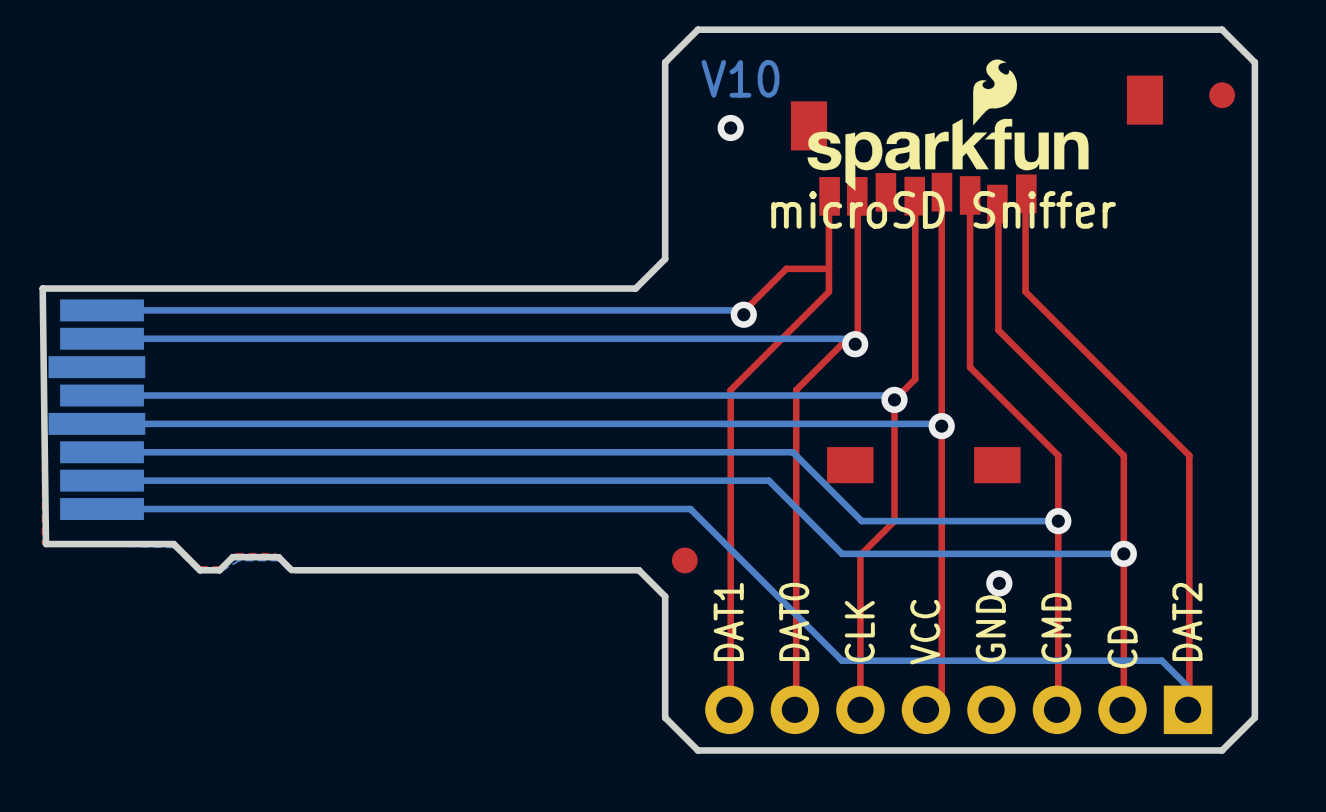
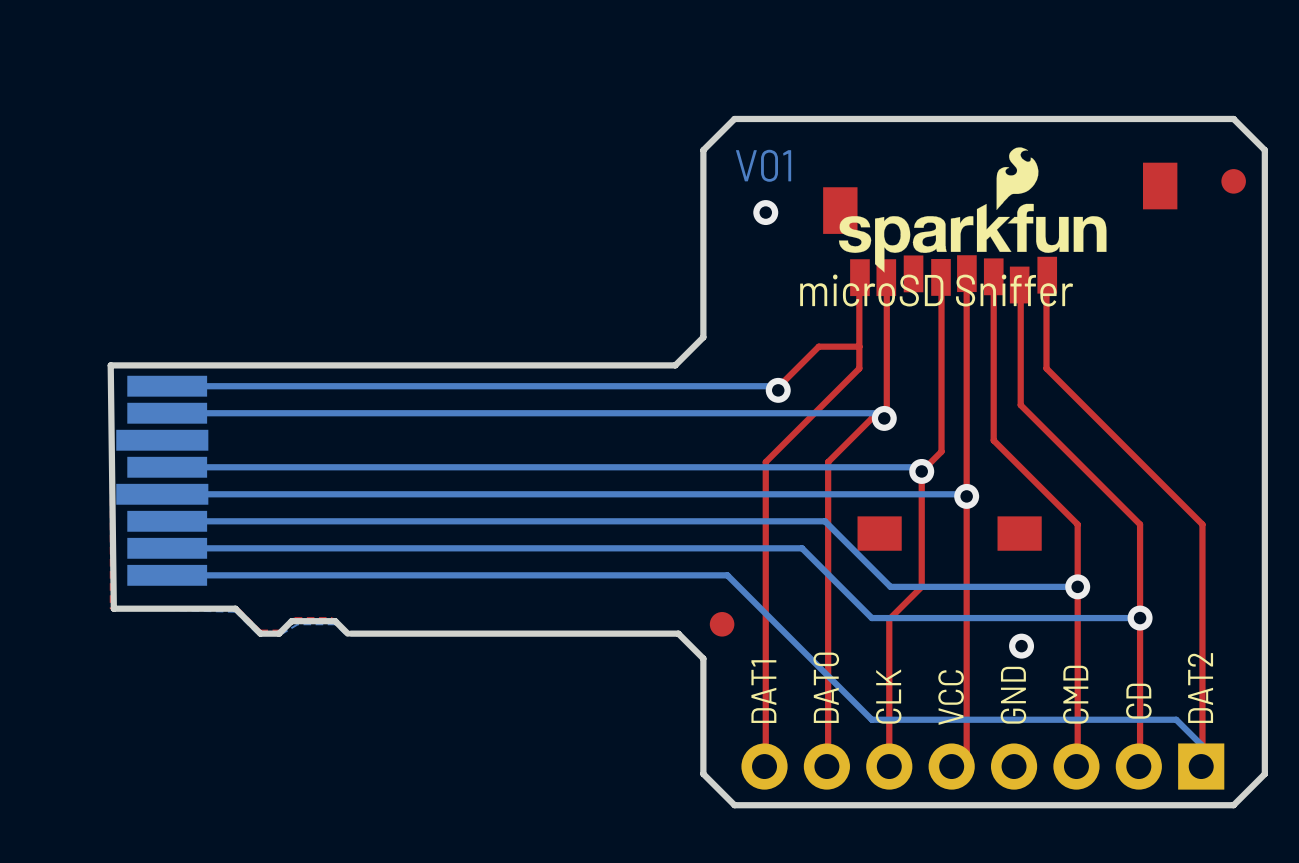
text: V10 (740, 78) -> V01 (763, 165)

